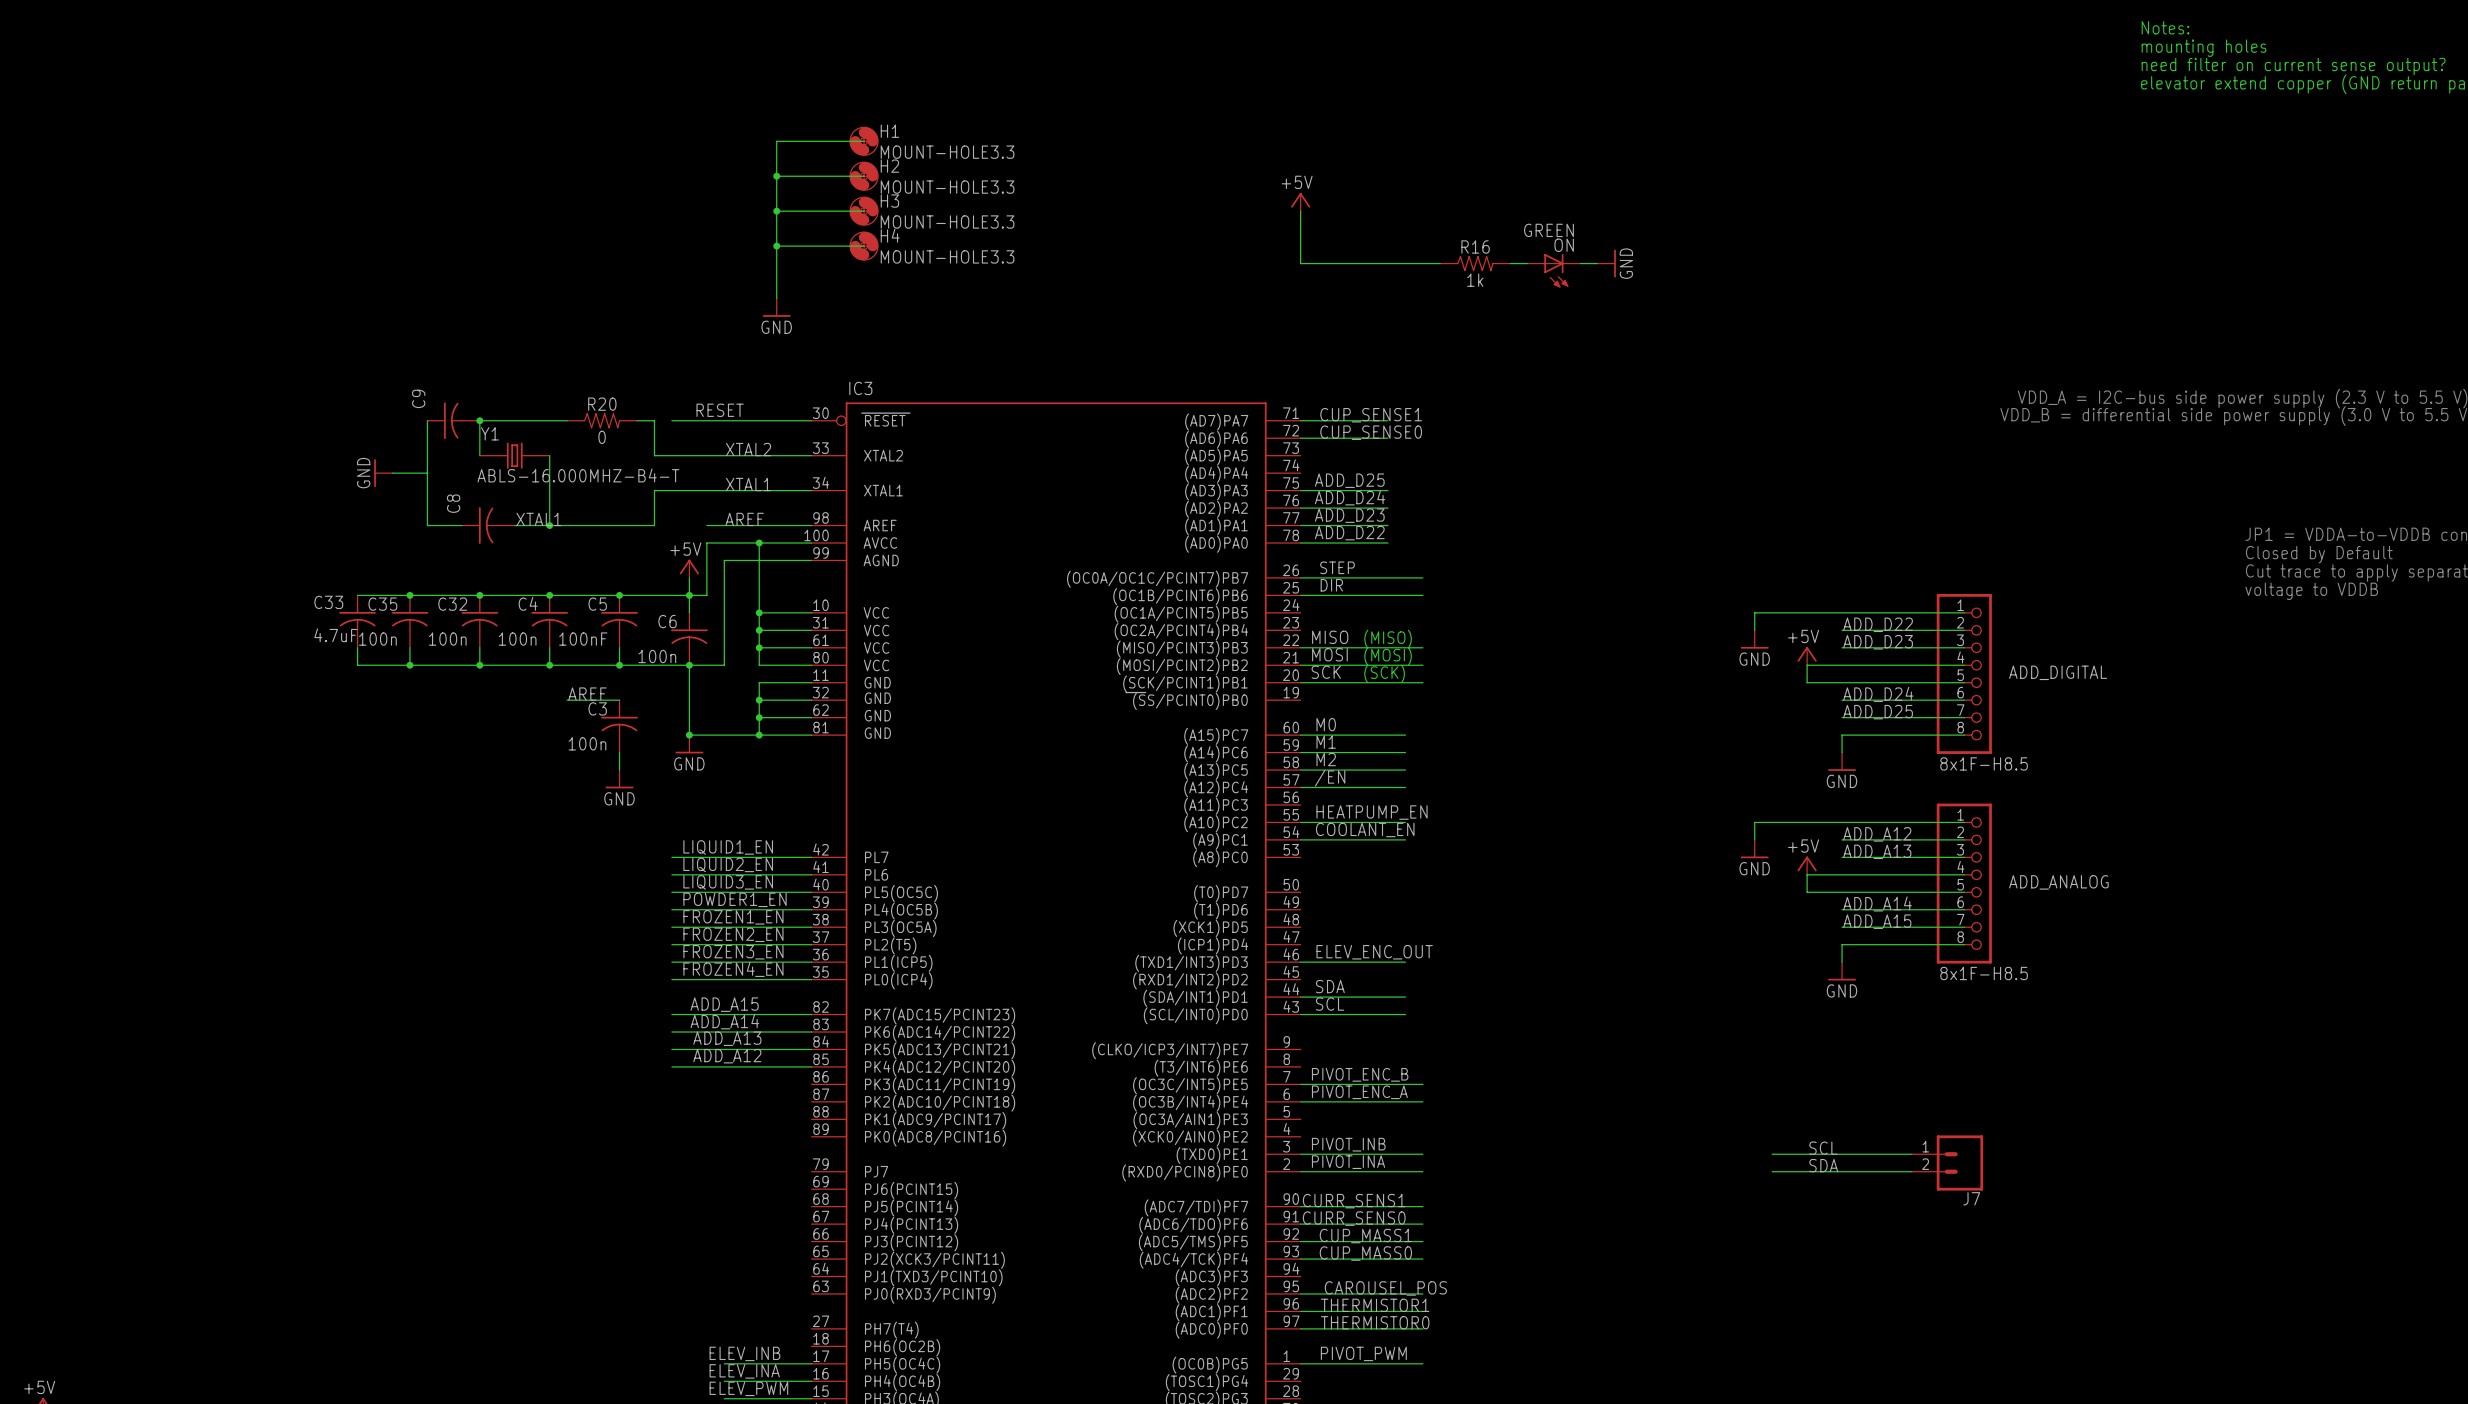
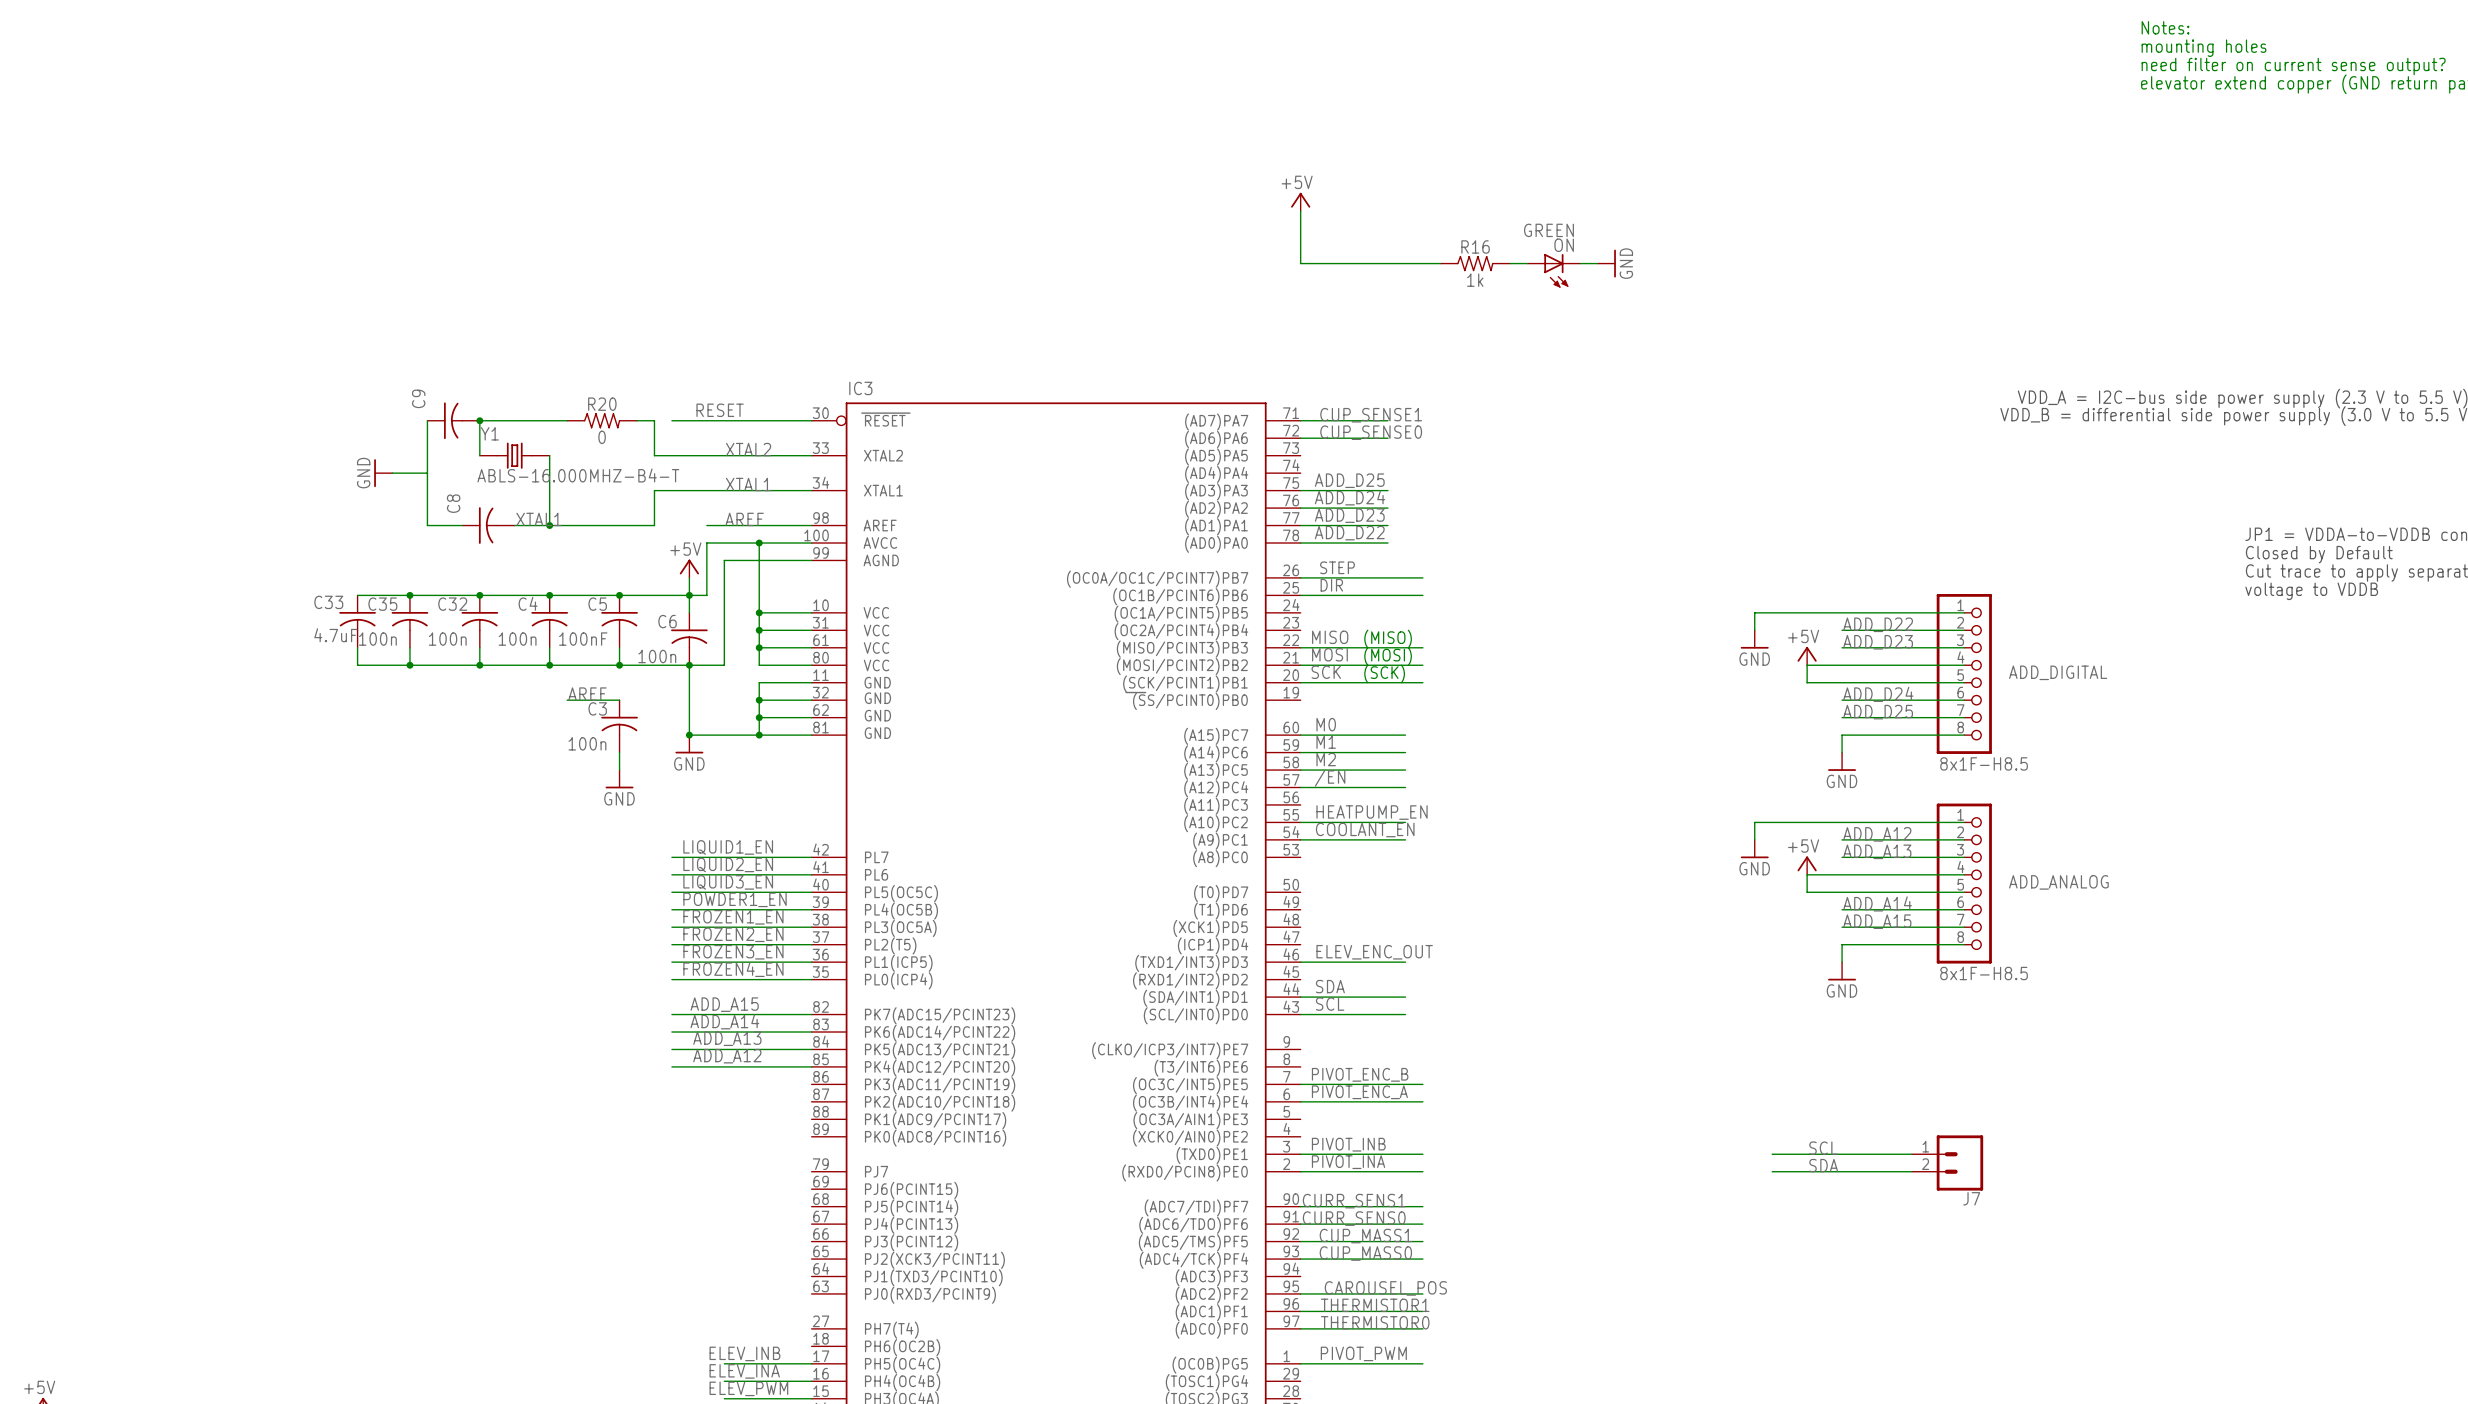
wire: (864, 141) (776, 141) (776, 298) -> none
H1: MOUNT-HOLE3.3 (864, 141) -> none
wire: (776, 176) (864, 176) -> none
junction: (776, 176) -> none
H2: MOUNT-HOLE3.3 (864, 176) -> none
wire: (776, 211) (864, 211) -> none
junction: (776, 211) -> none
H3: MOUNT-HOLE3.3 (864, 211) -> none
wire: (776, 246) (864, 246) -> none
junction: (776, 246) -> none
H4: MOUNT-HOLE3.3 (864, 246) -> none
power symbol: GND (776, 307) -> none

